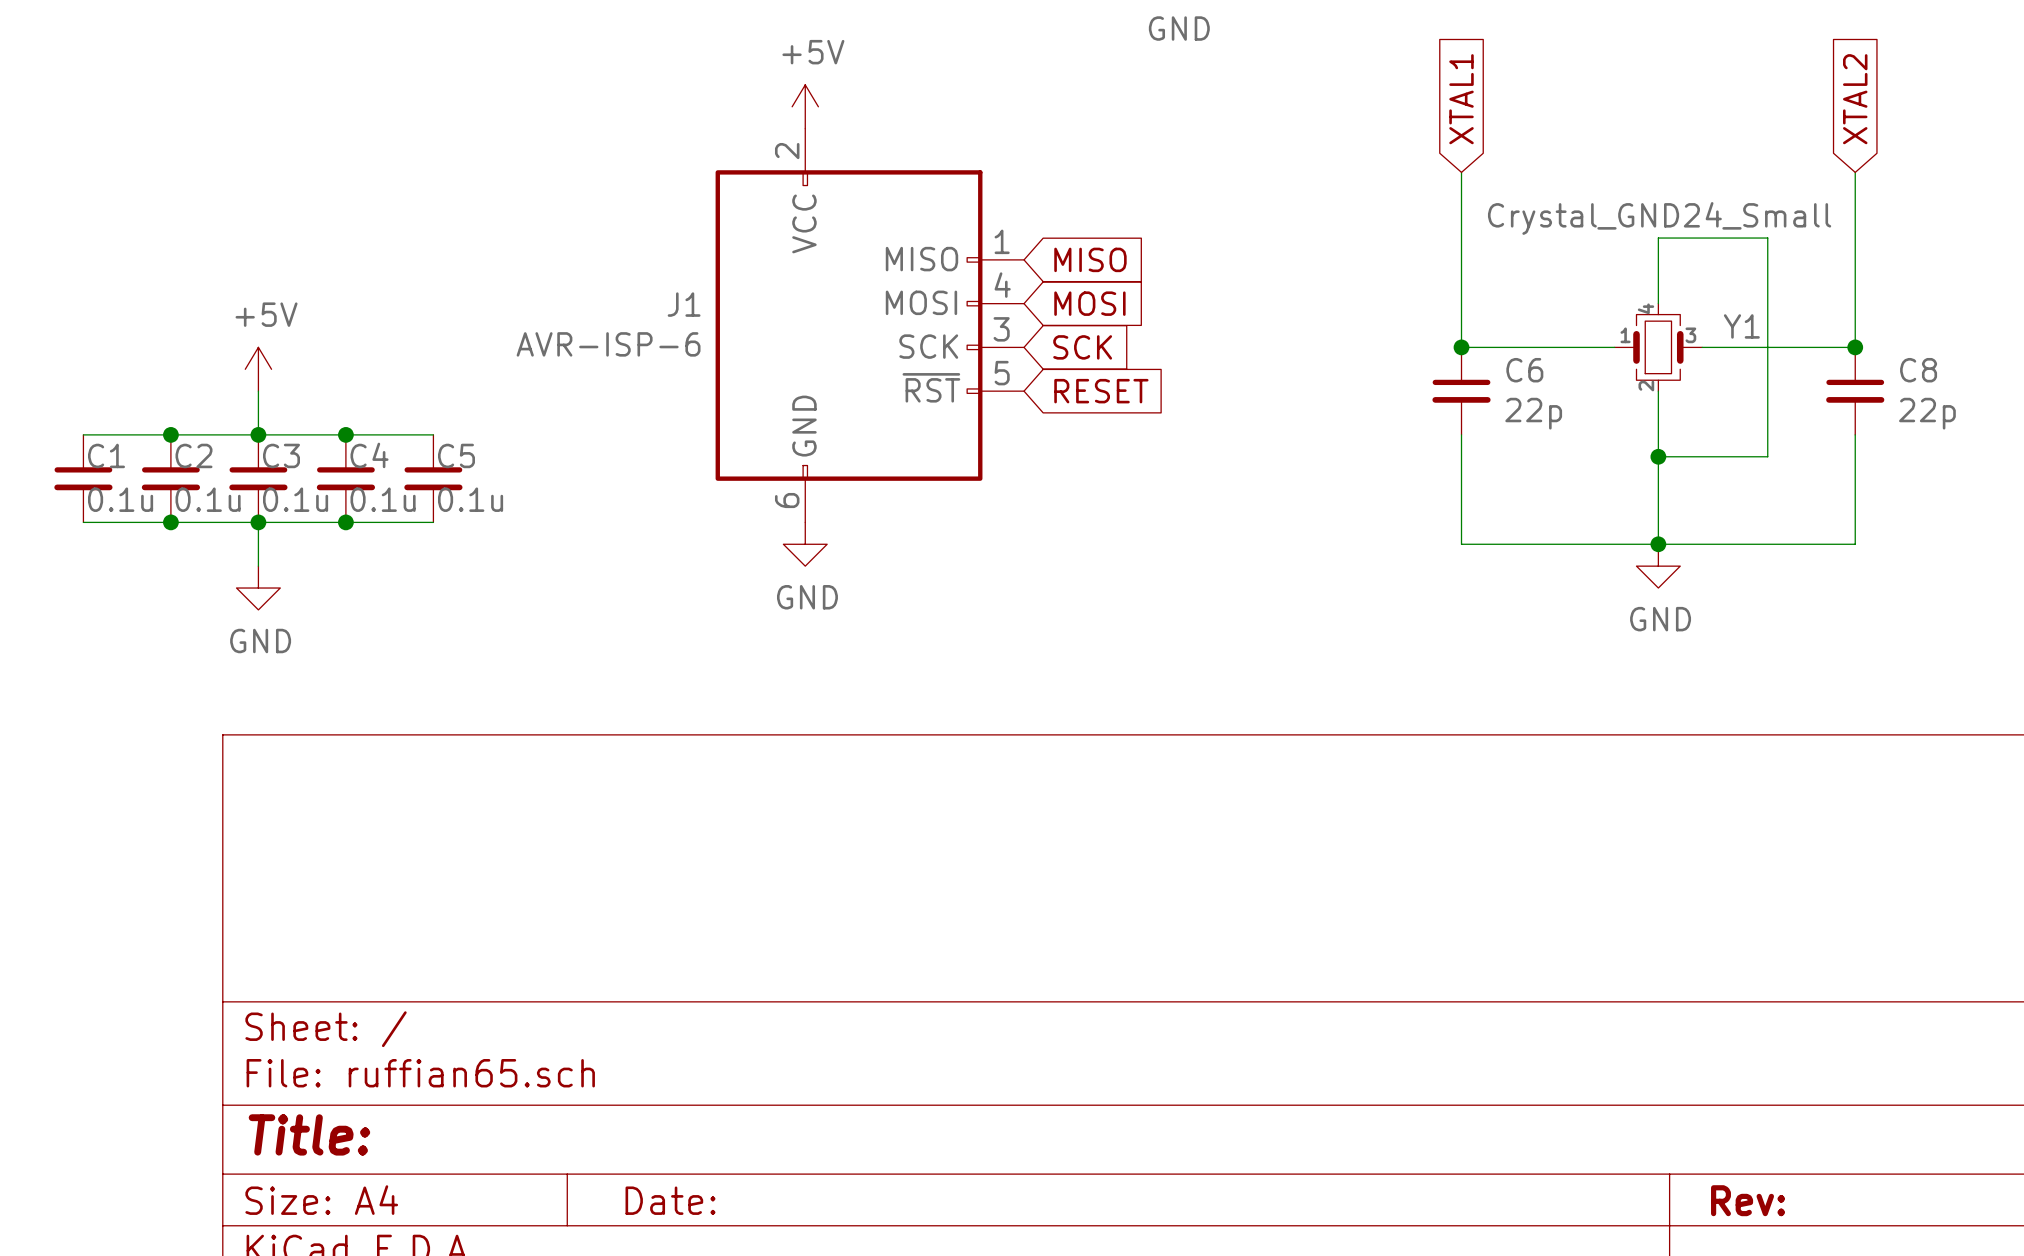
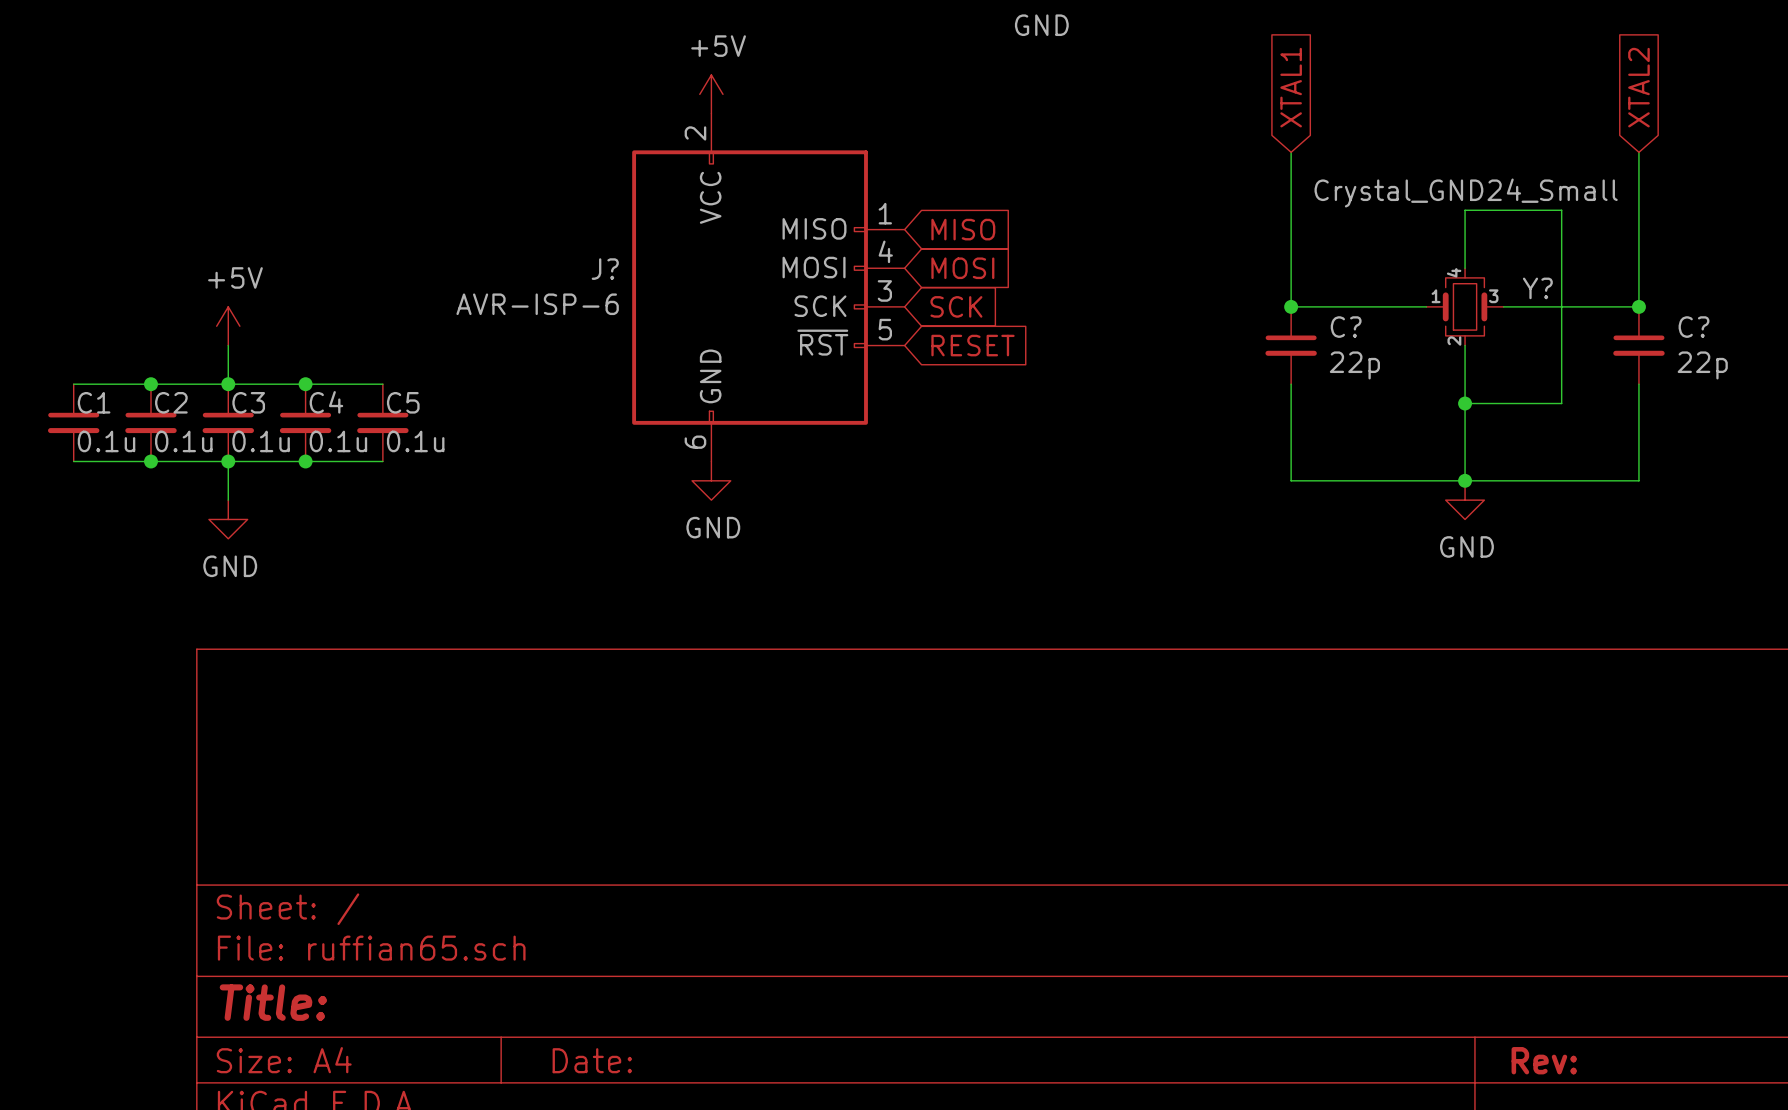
J1 name: J1 (684, 304) -> J? (605, 269)
Y1 name: Y1 (1741, 326) -> Y? (1537, 288)
C6 name: C6 (1524, 370) -> C? (1346, 327)
C8 name: C8 (1918, 370) -> C? (1693, 327)

